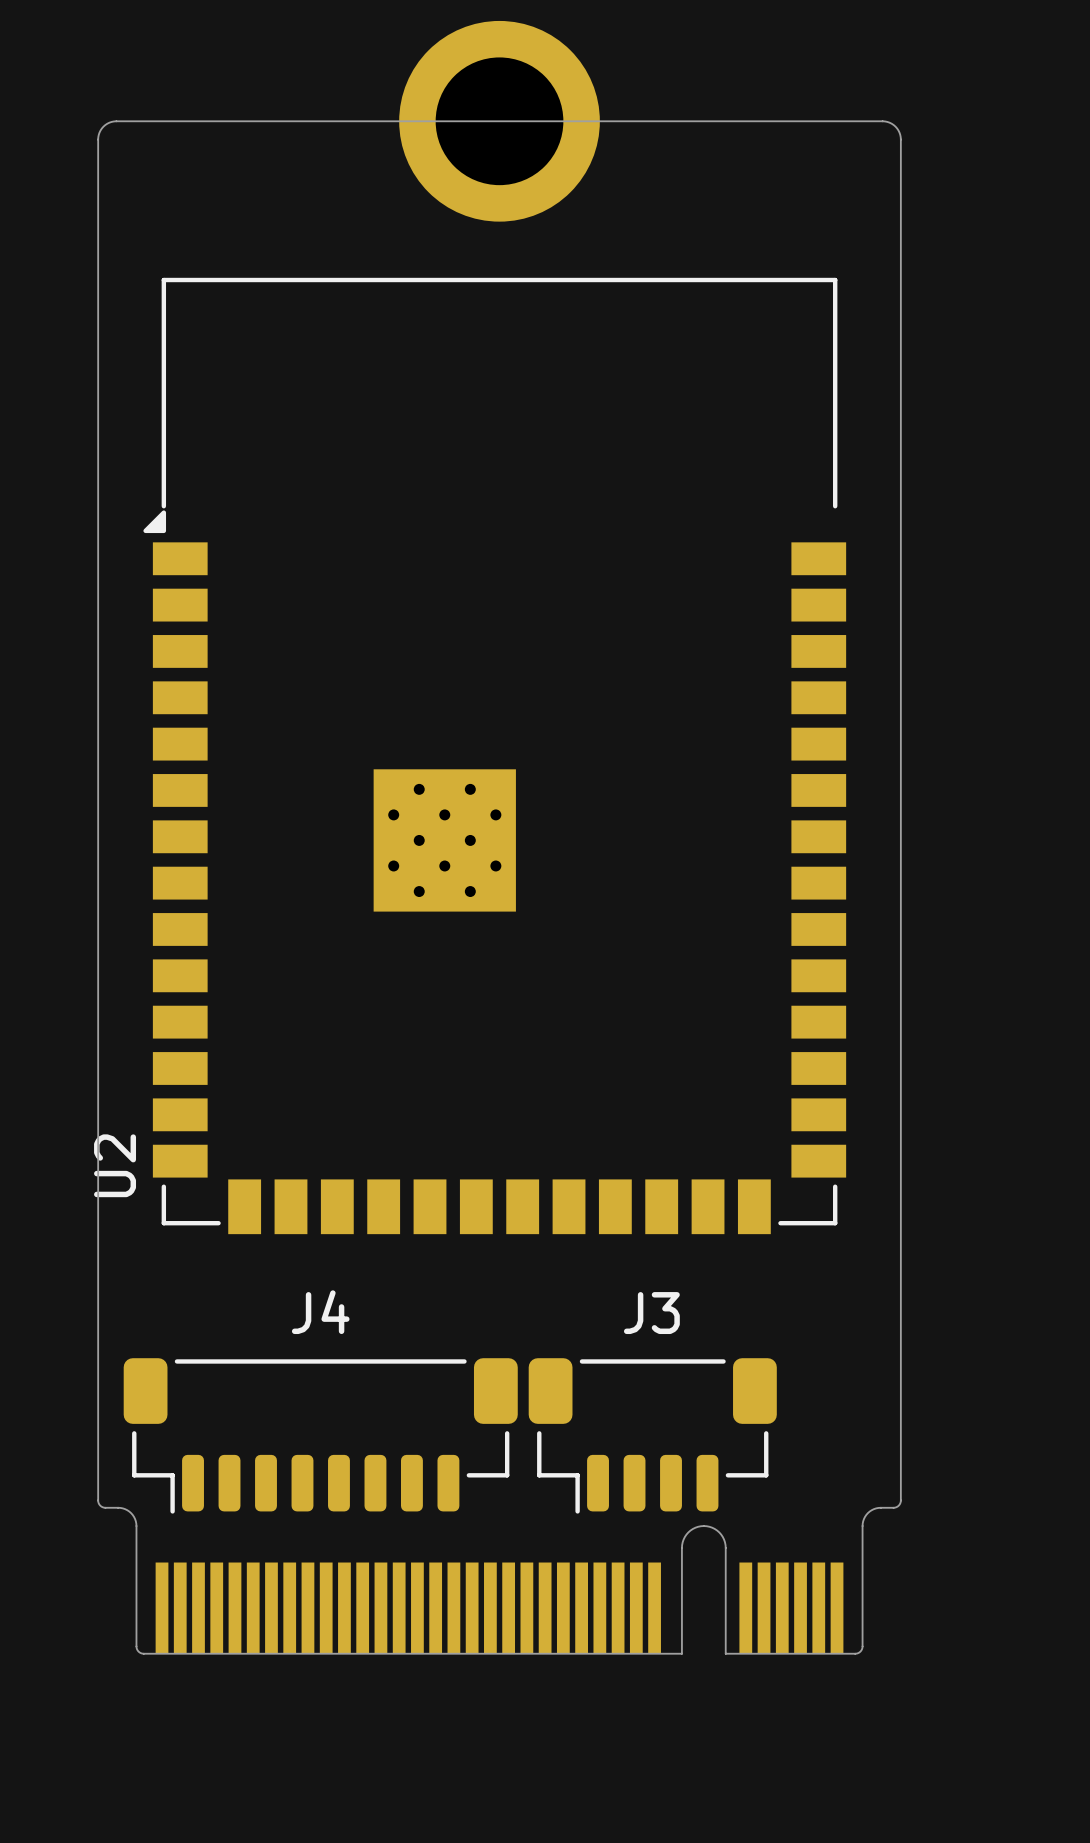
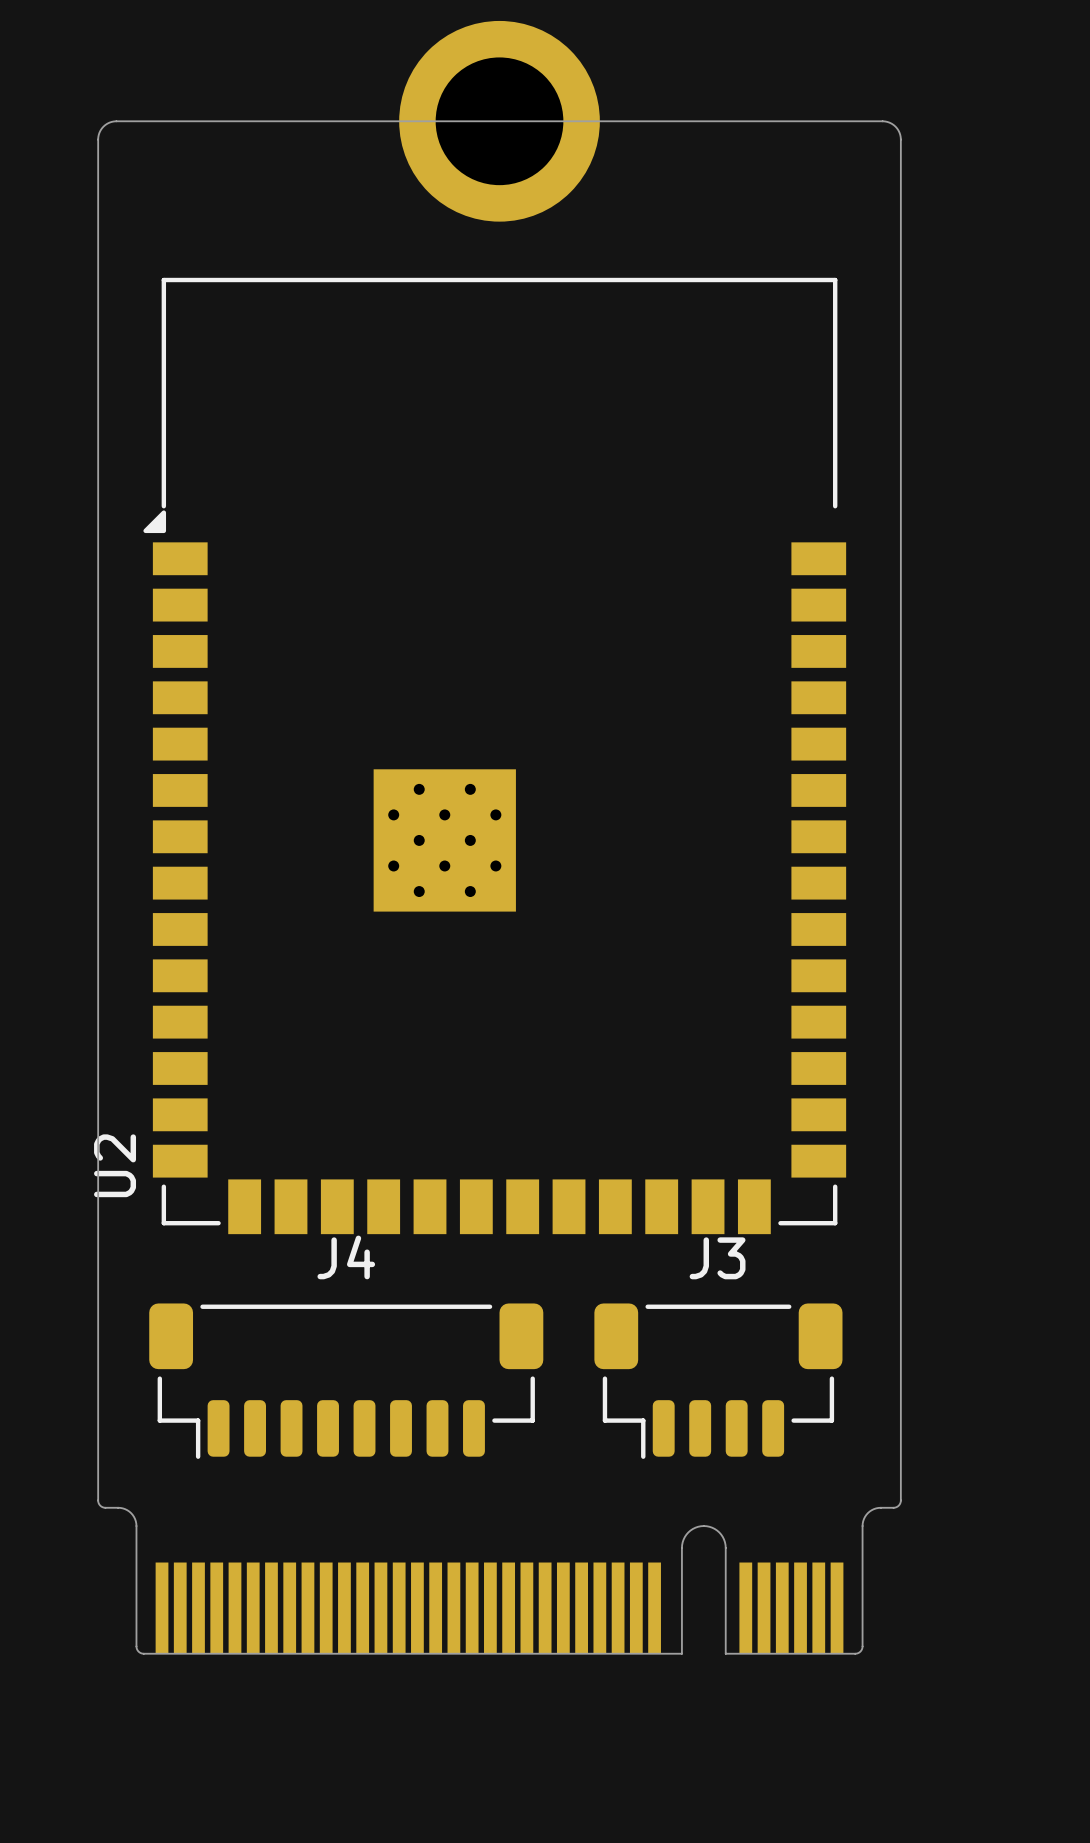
J4 position: (320, 1435) -> (346, 1381)
J3 position: (652, 1435) -> (718, 1381)

